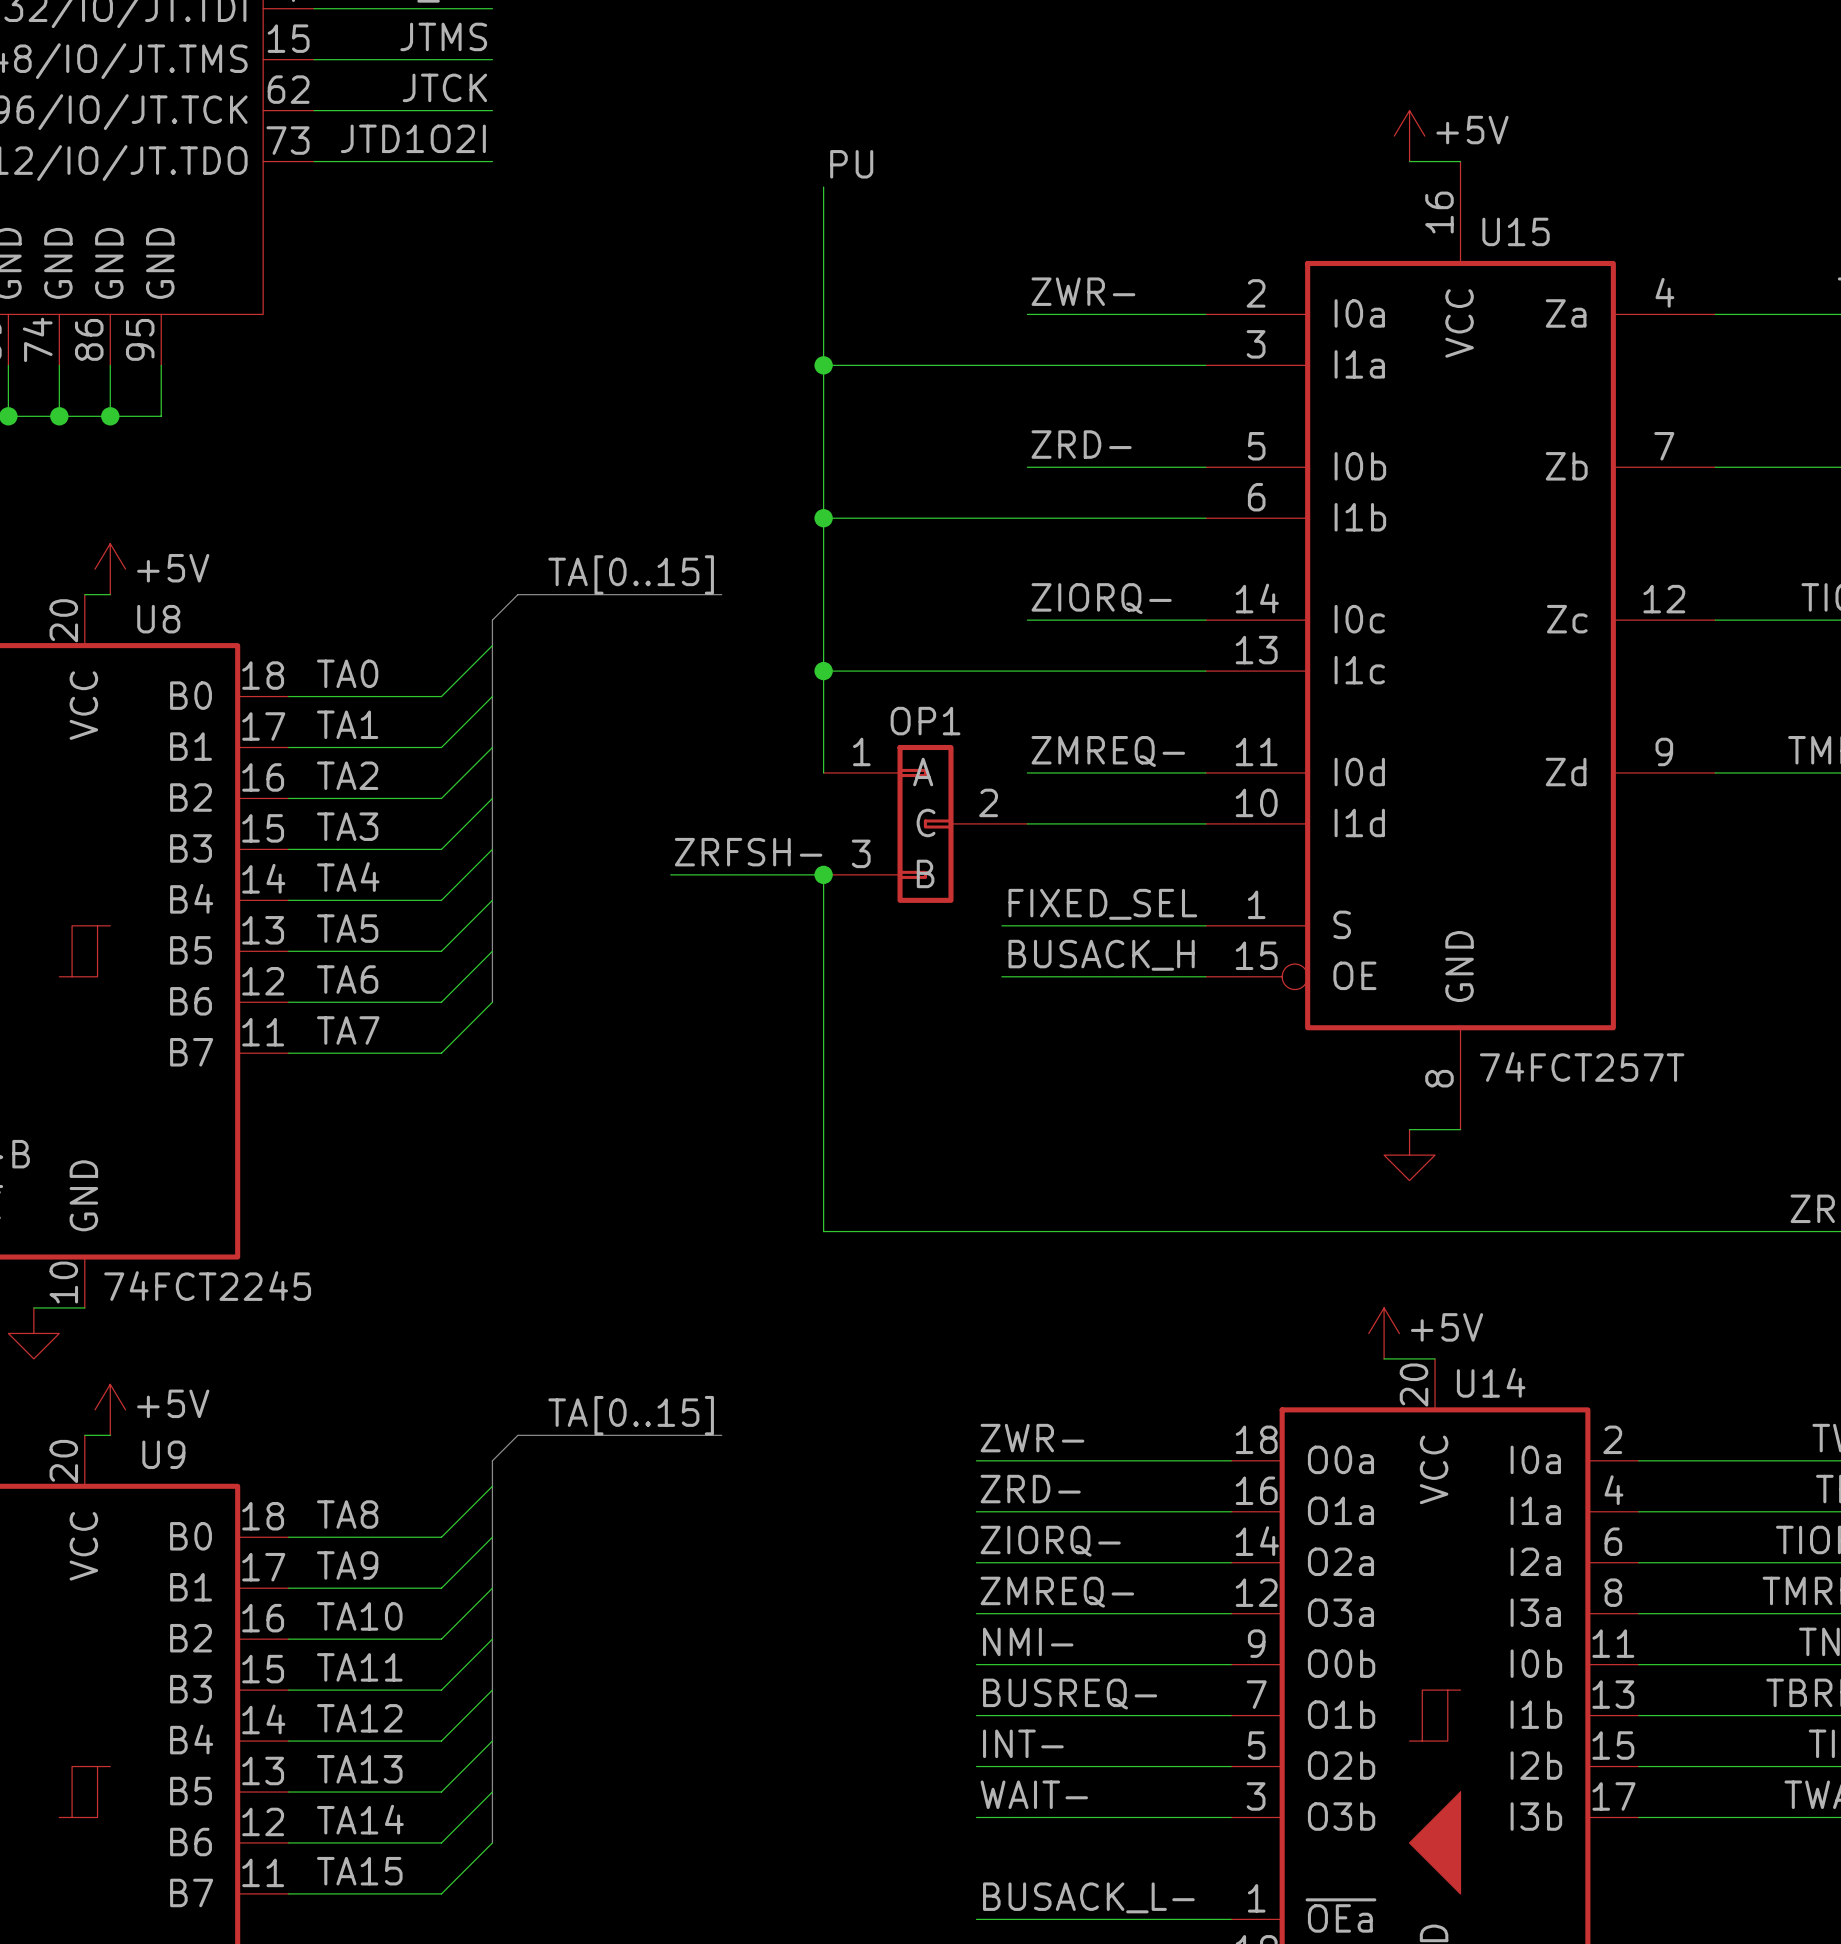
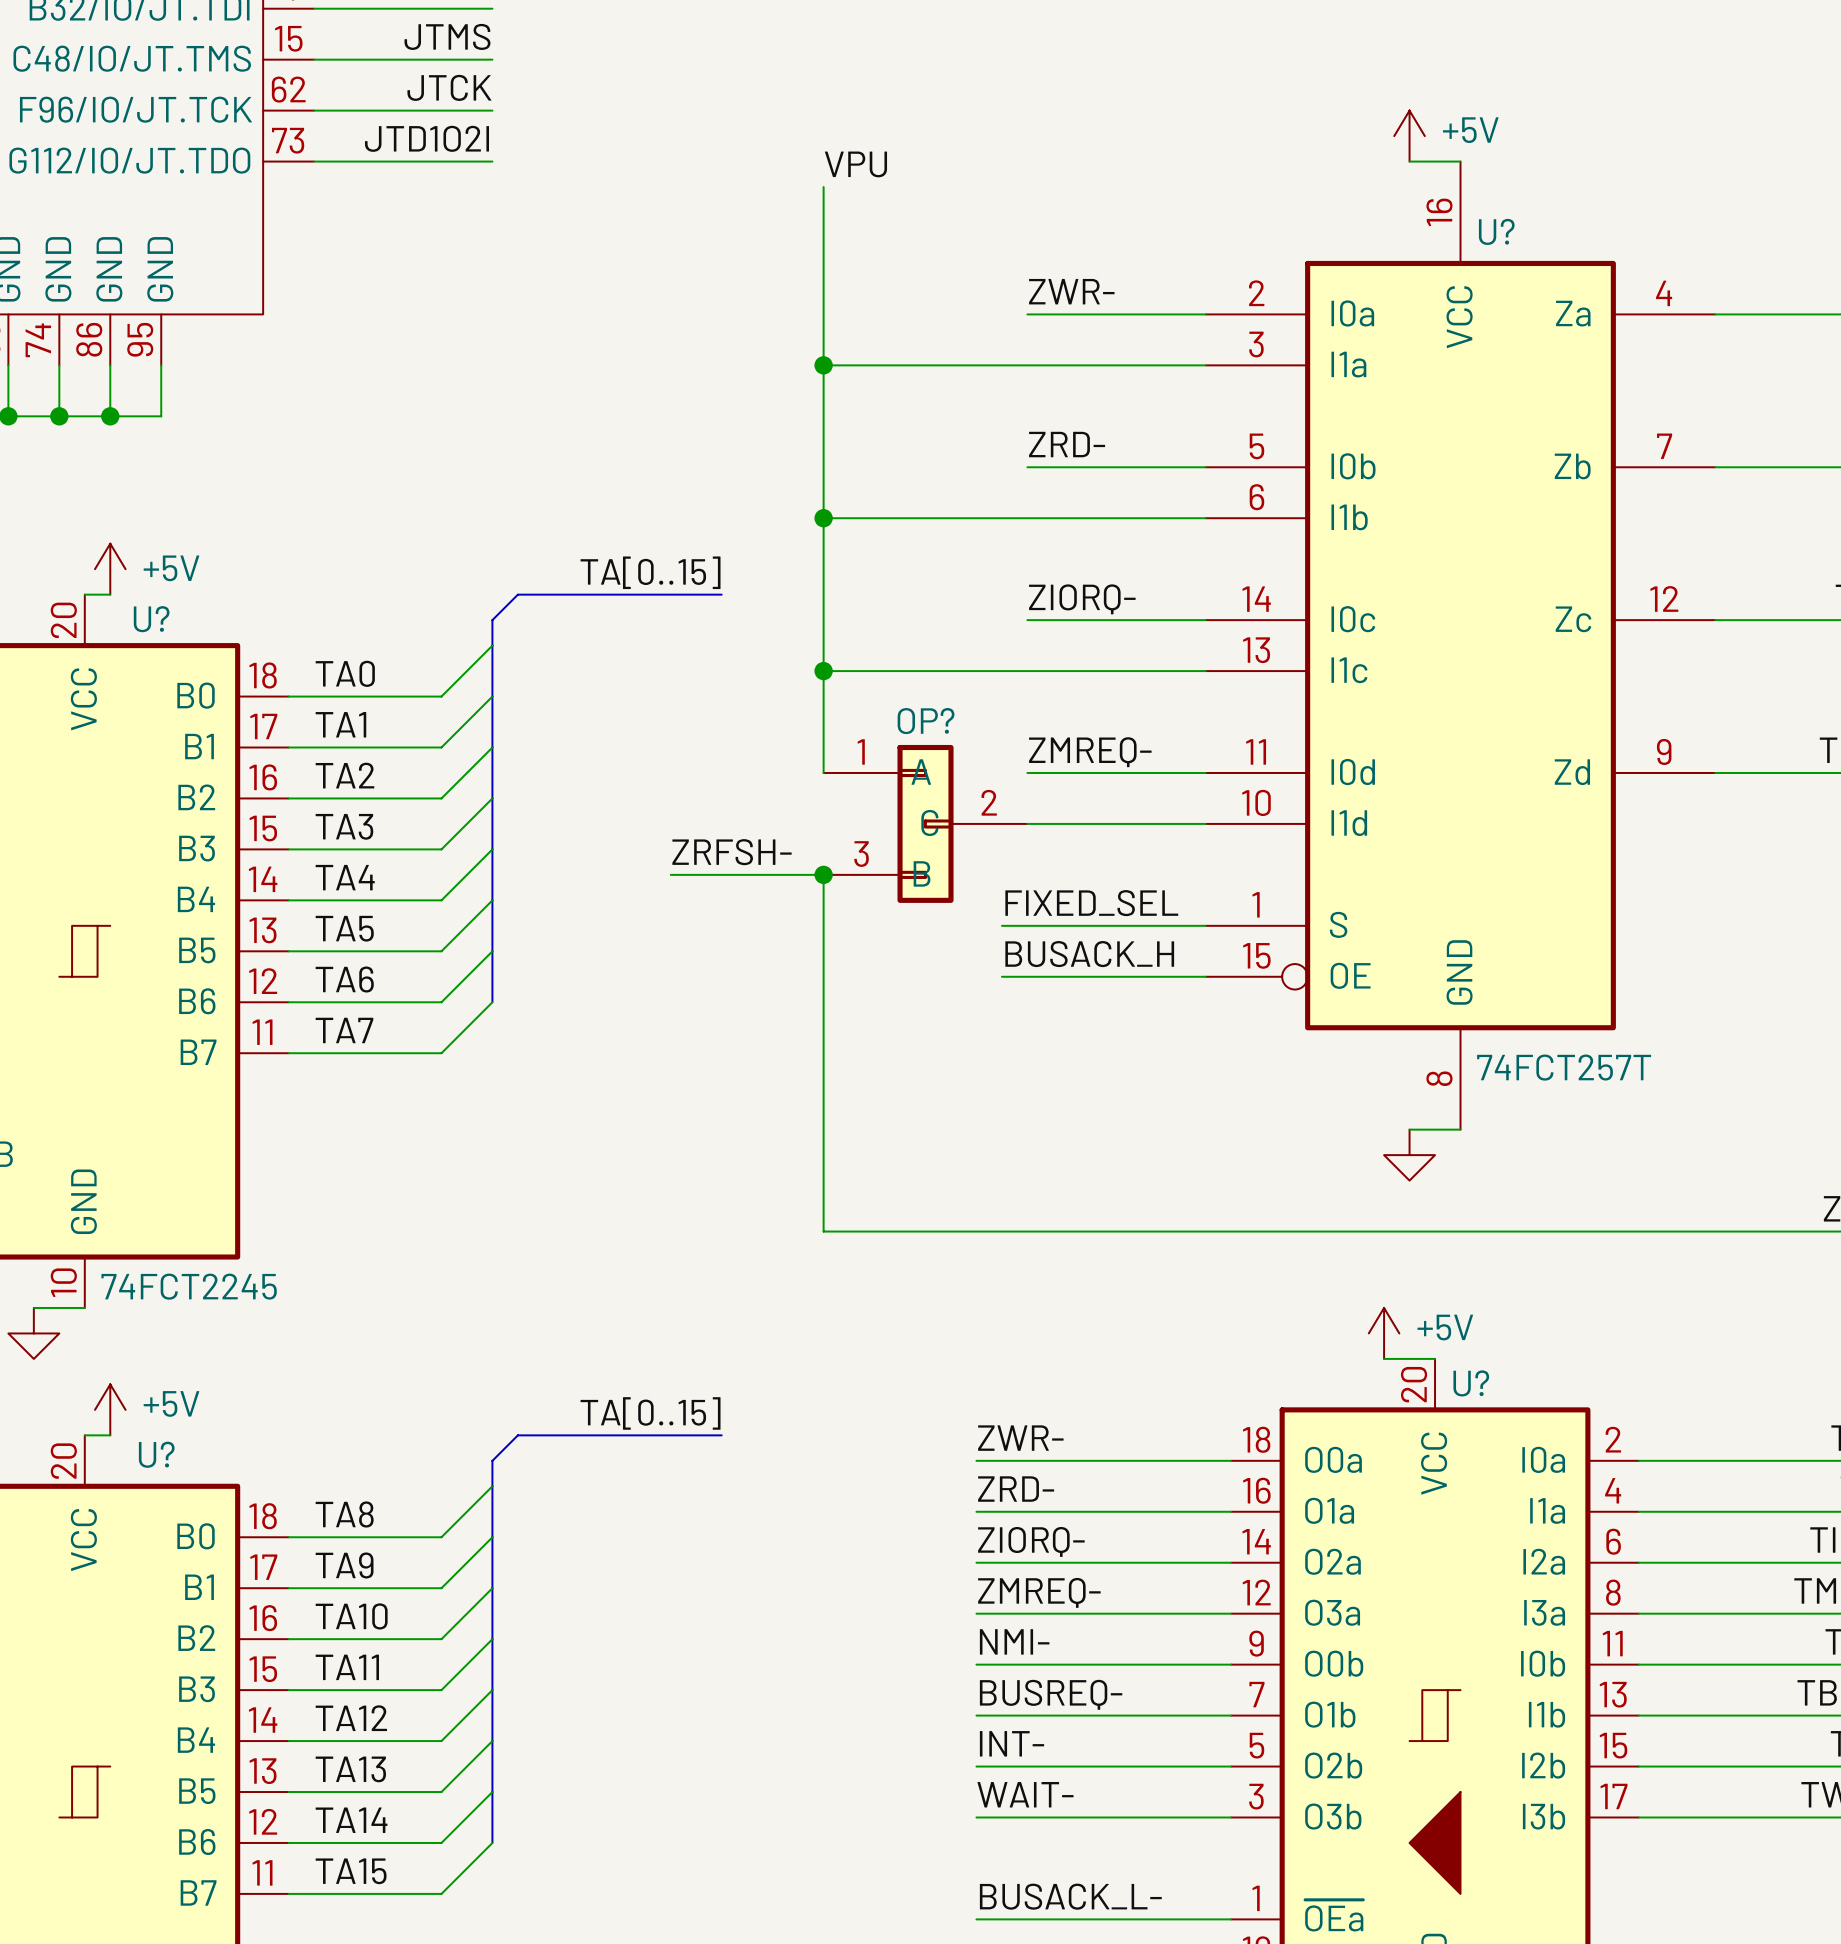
label: PU (851, 164) -> VPU (855, 164)
U15 name: U15 (1516, 231) -> U? (1496, 231)
U8 name: U8 (158, 619) -> U? (151, 619)
OP1 name: OP1 (925, 721) -> OP? (926, 721)
U14 name: U14 (1491, 1382) -> U? (1471, 1383)
U9 name: U9 (163, 1454) -> U? (156, 1454)

